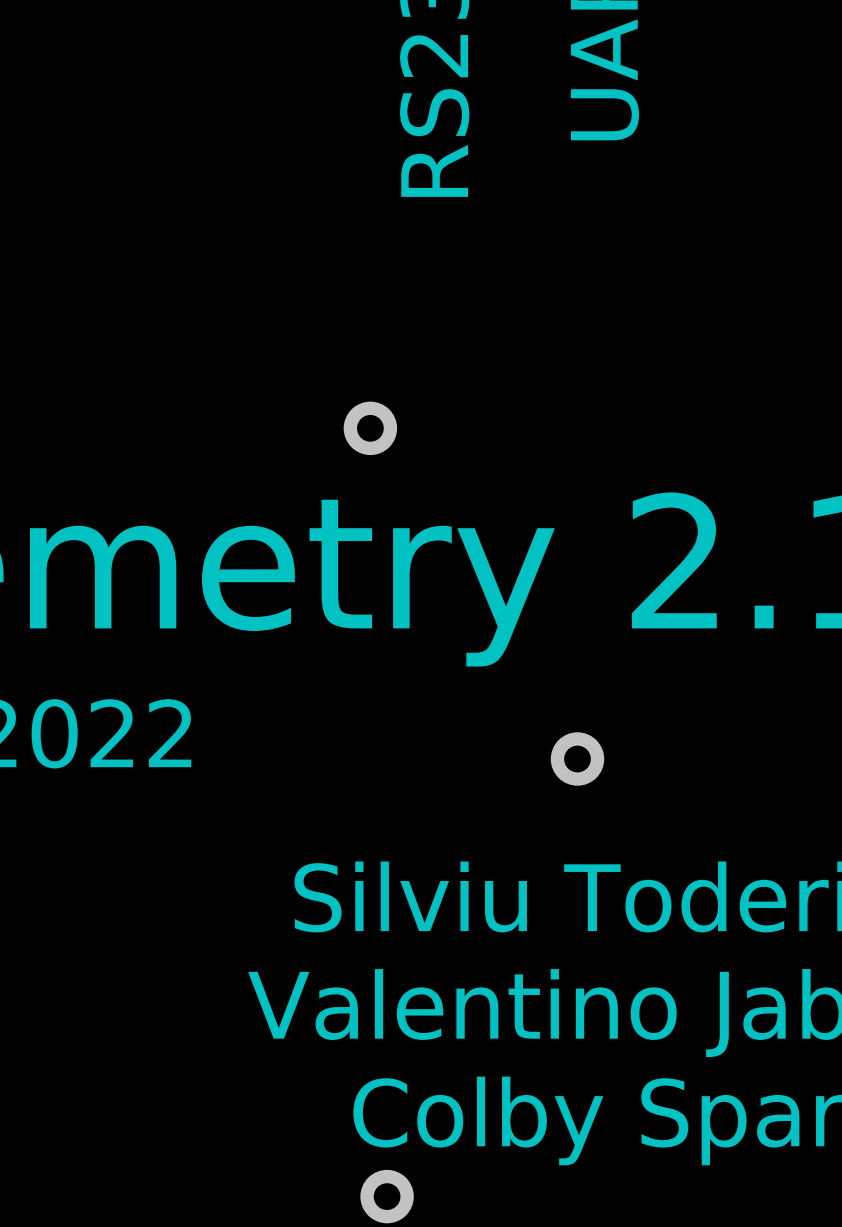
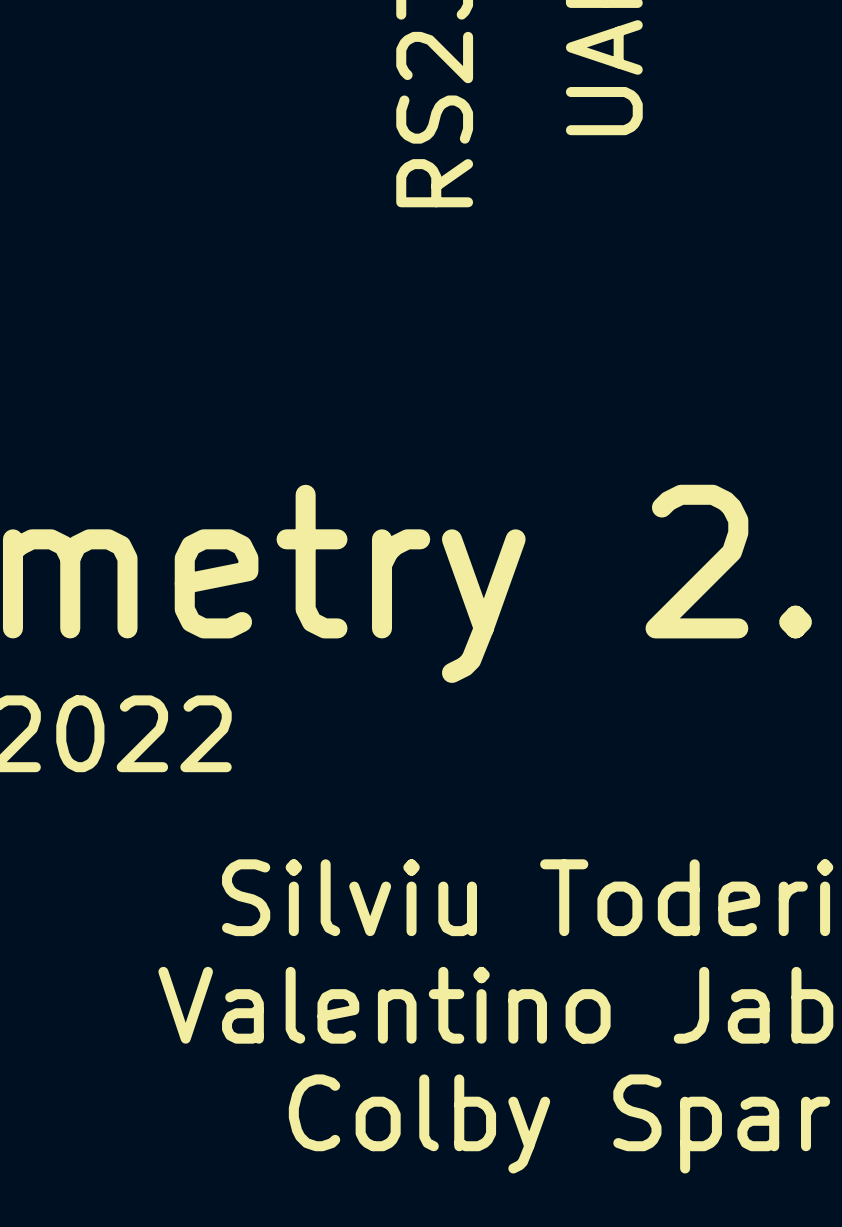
via: (370, 428) -> none
via: (577, 759) -> none
via: (387, 1196) -> none

